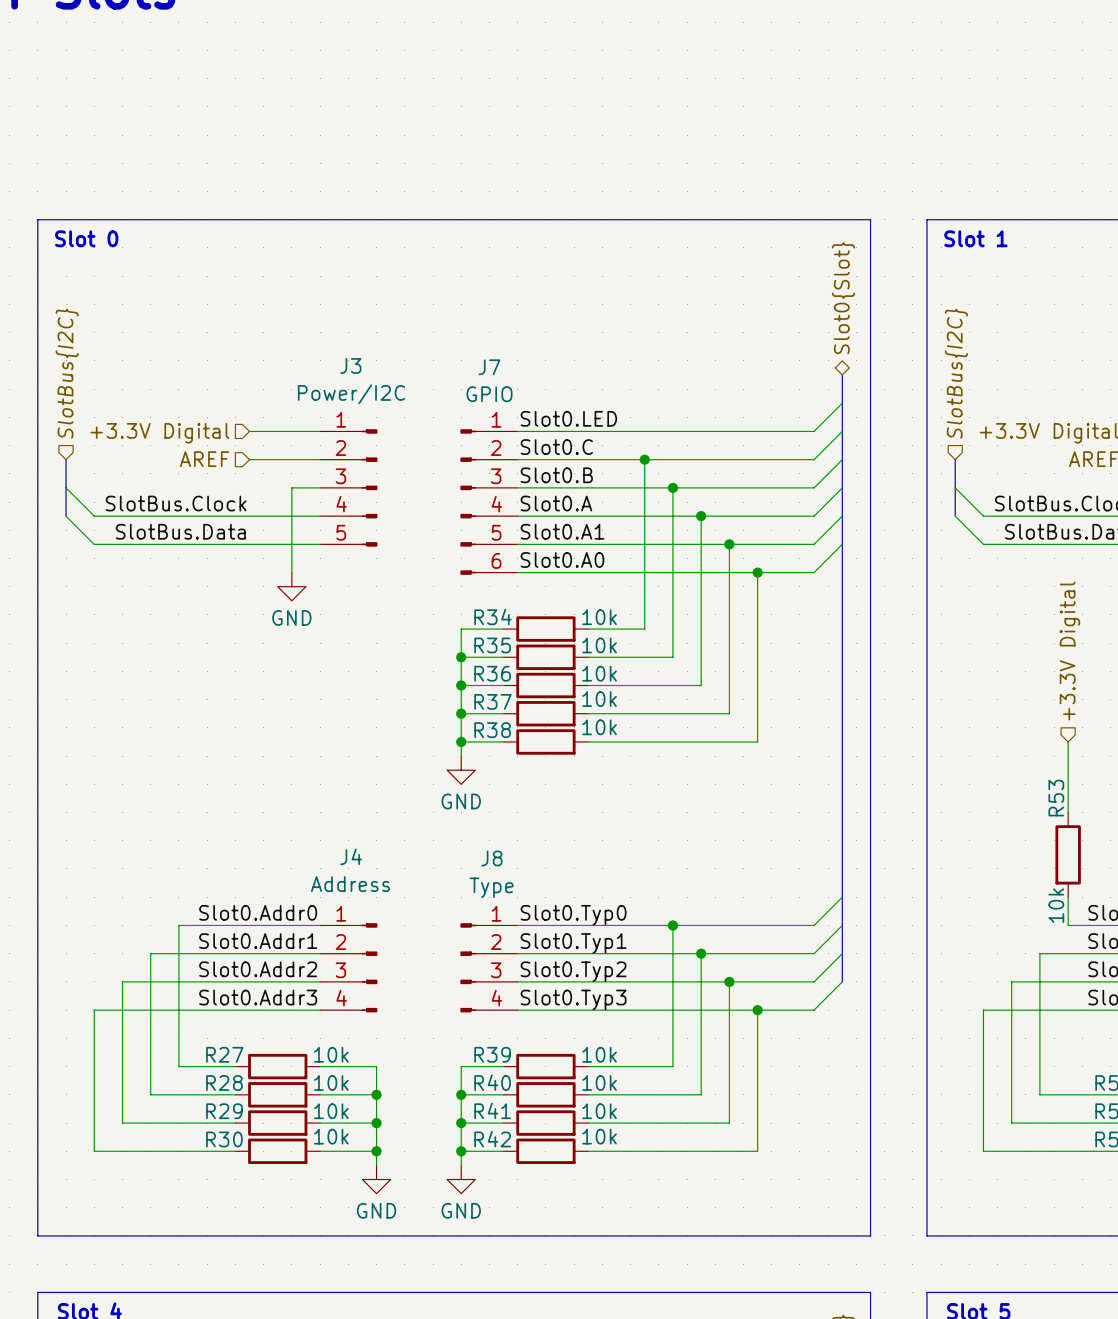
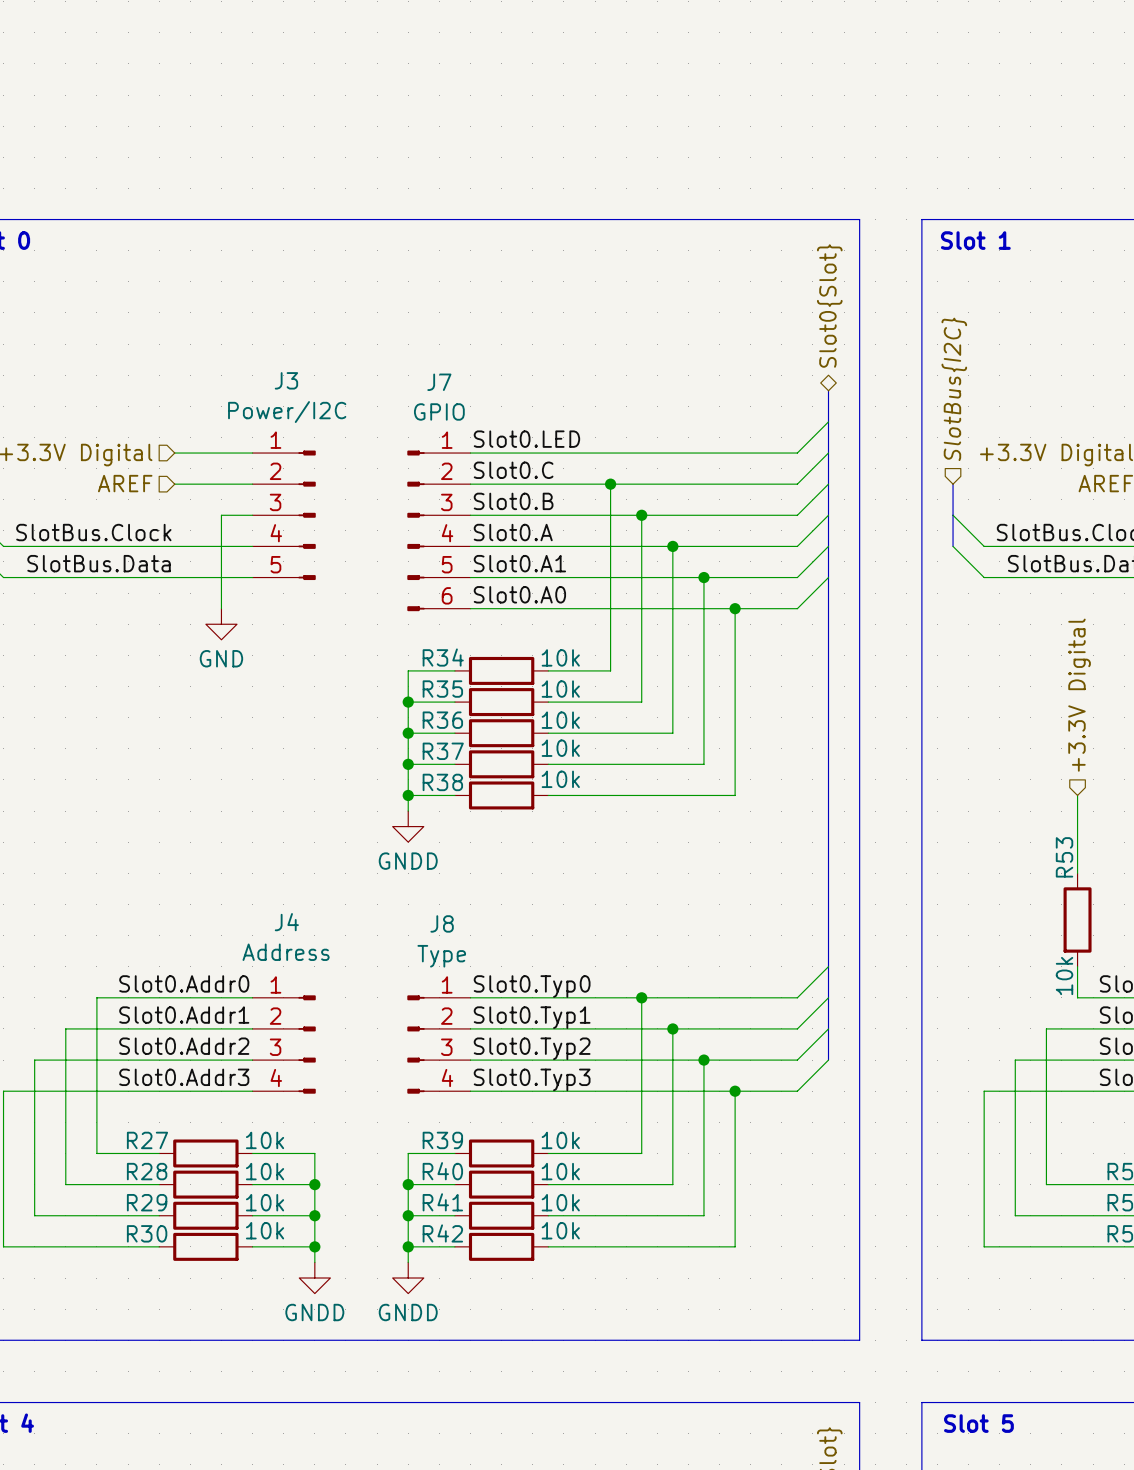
power symbol: GND (461, 770) -> GNDD (408, 826)
power symbol: GND (376, 1179) -> GNDD (314, 1278)
power symbol: GND (461, 1179) -> GNDD (408, 1278)

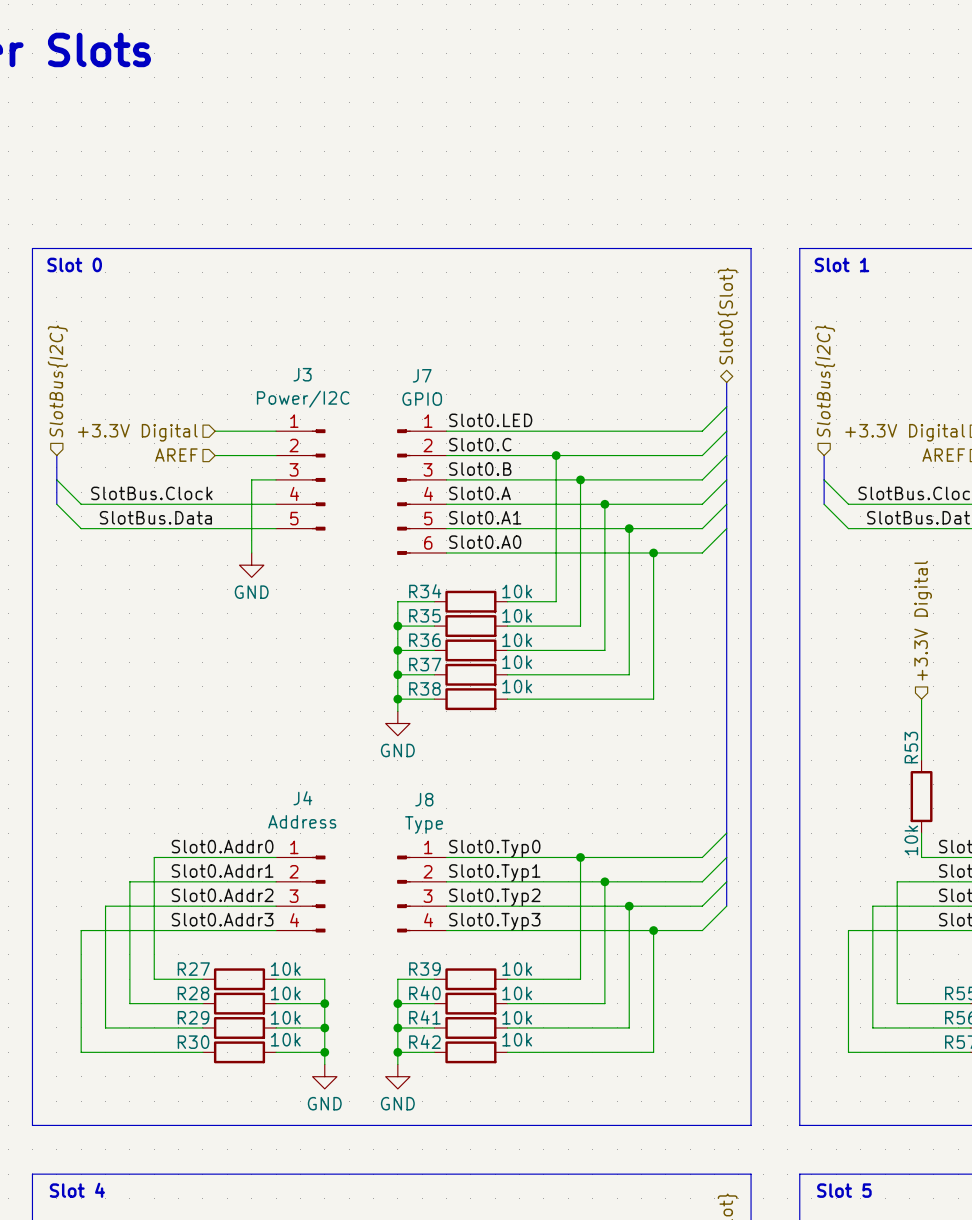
power symbol: GNDD (408, 826) -> GND (397, 723)
power symbol: GNDD (314, 1278) -> GND (324, 1076)
power symbol: GNDD (408, 1278) -> GND (397, 1076)

